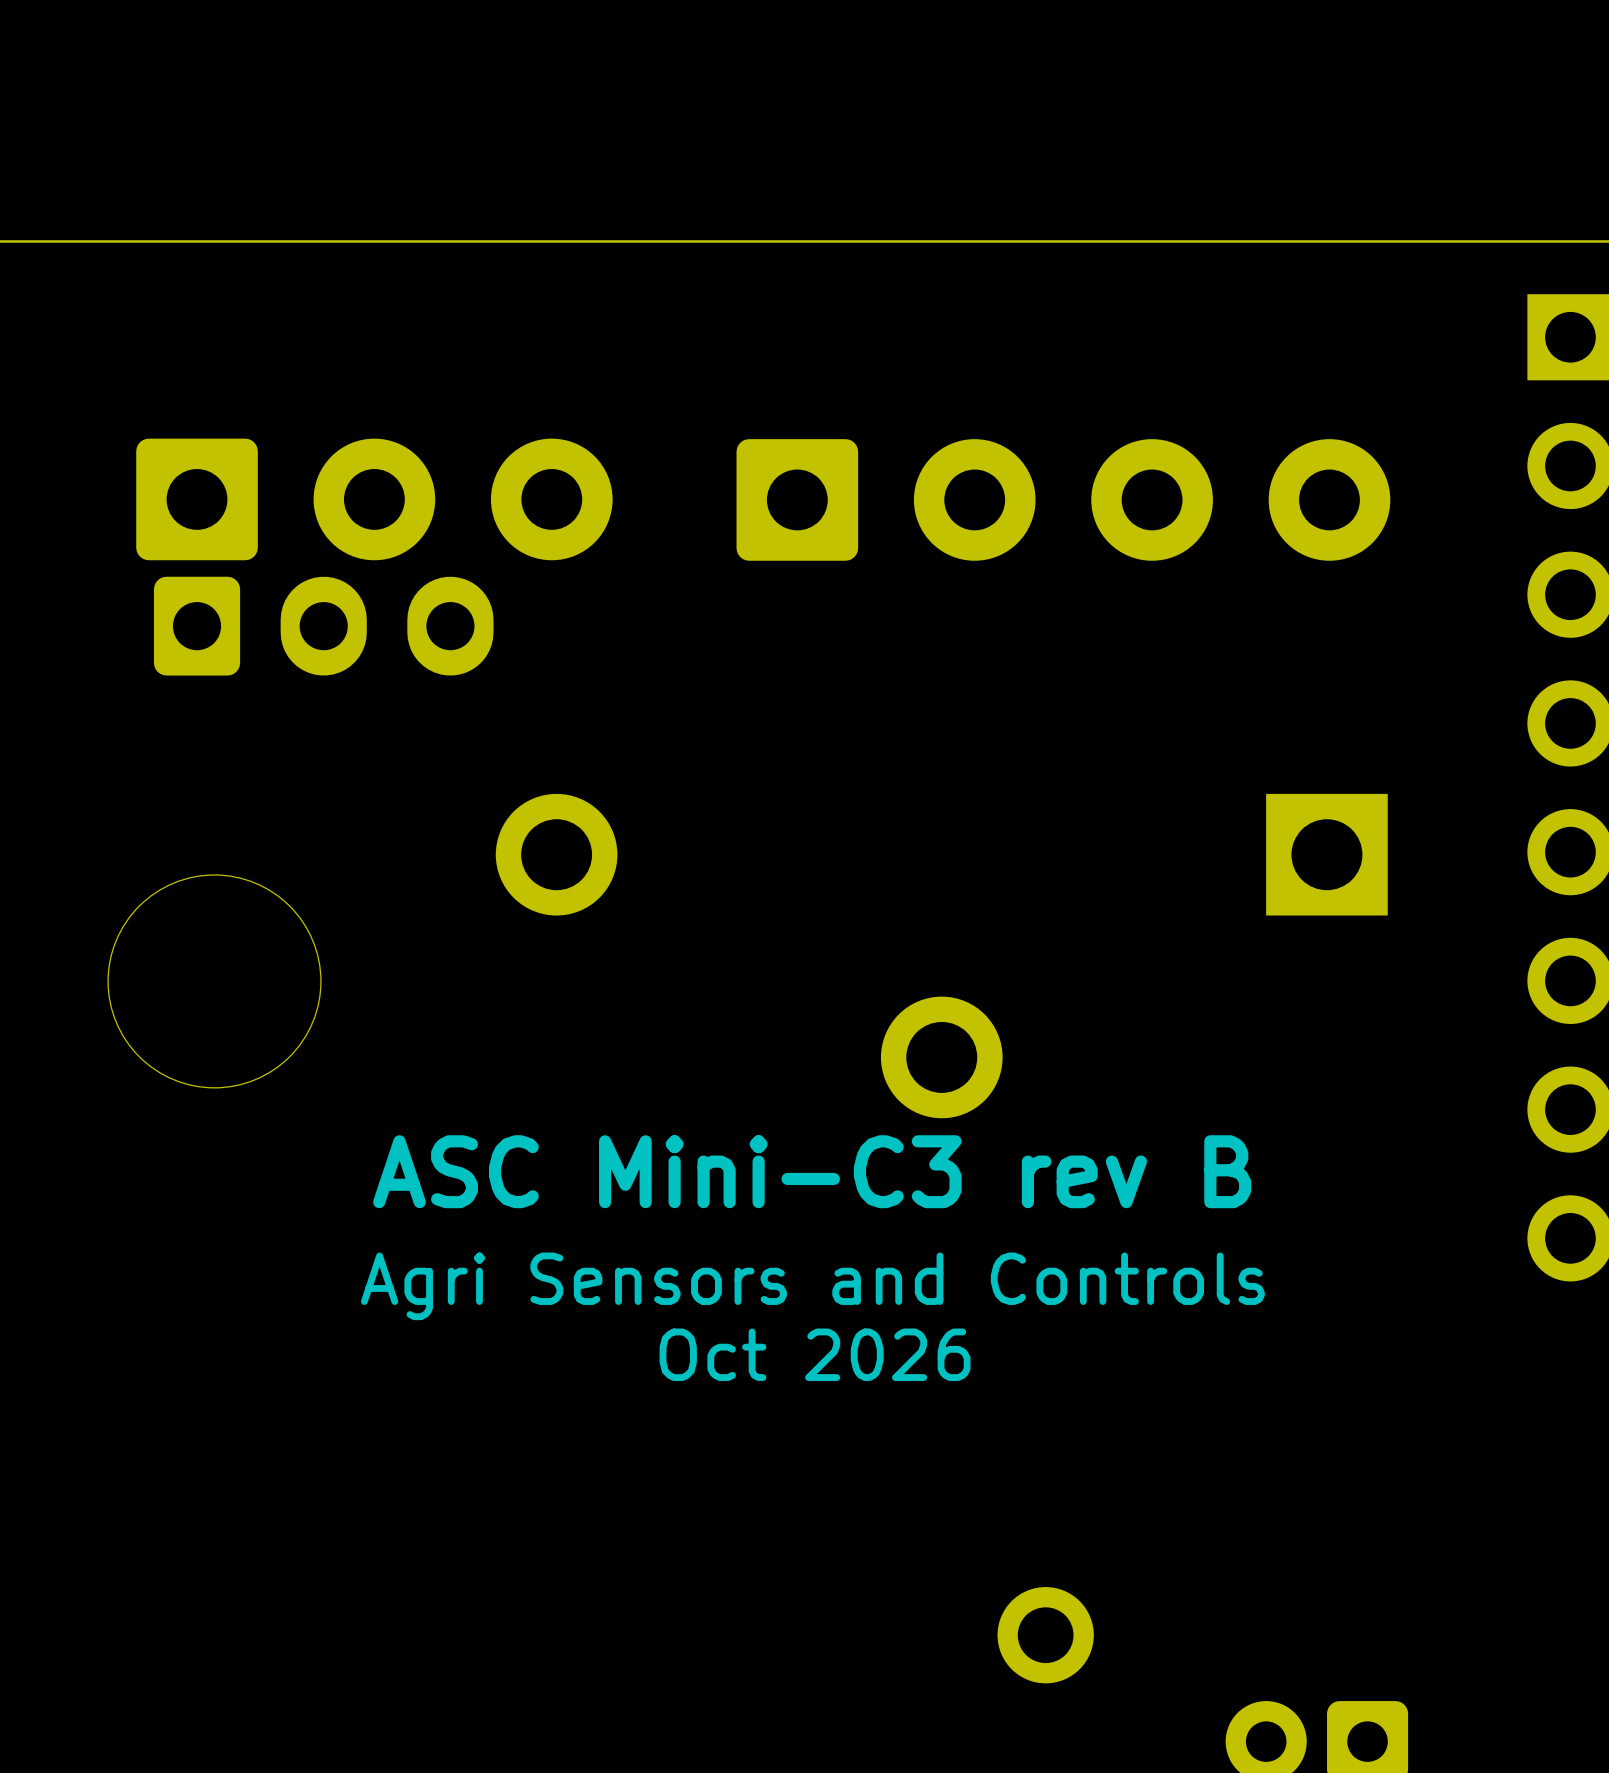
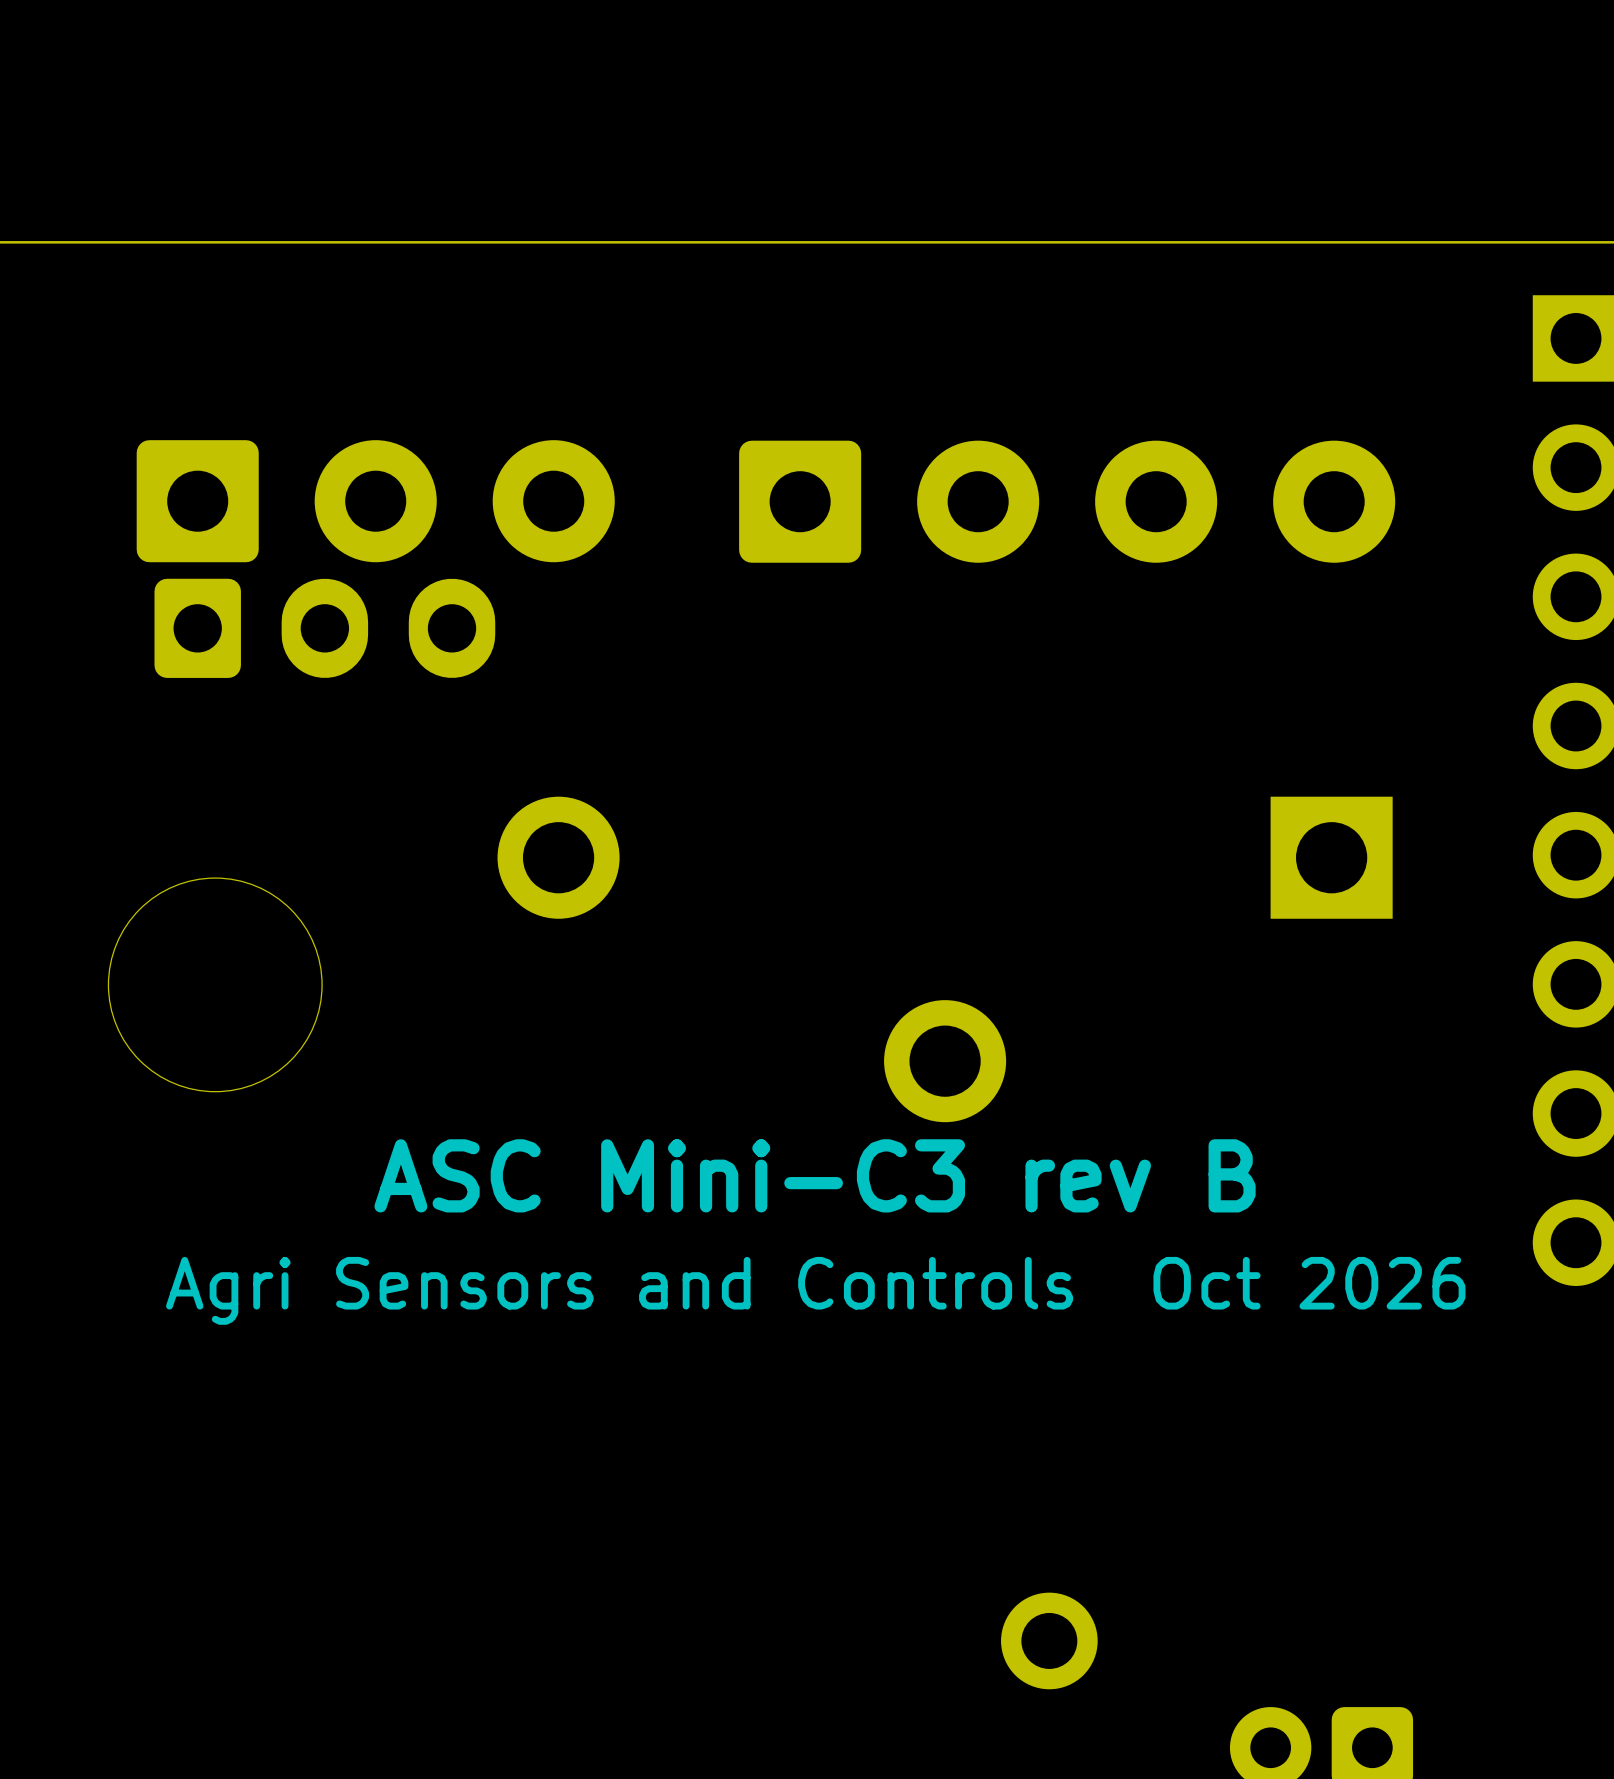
text: Agri Sensors and Controls (812, 1286) -> Agri Sensors and Controls Oct 2026 (815, 1290)
text: Oct 2026 (815, 1354) -> none

